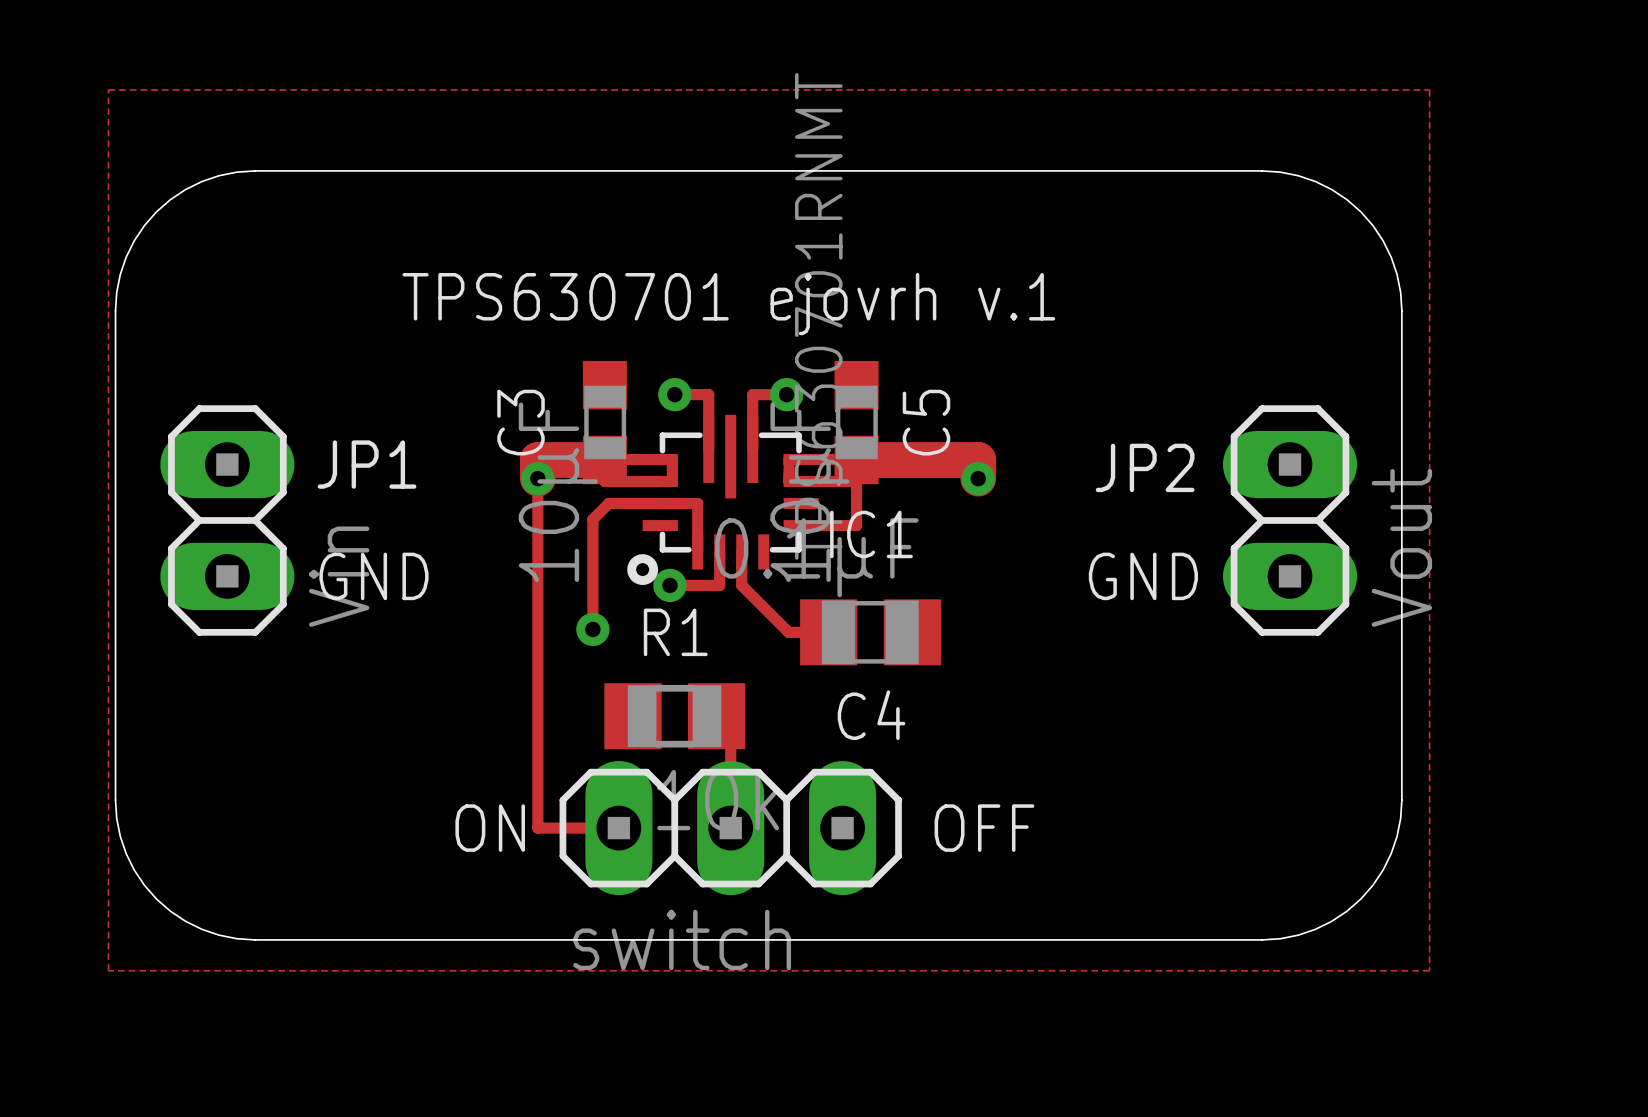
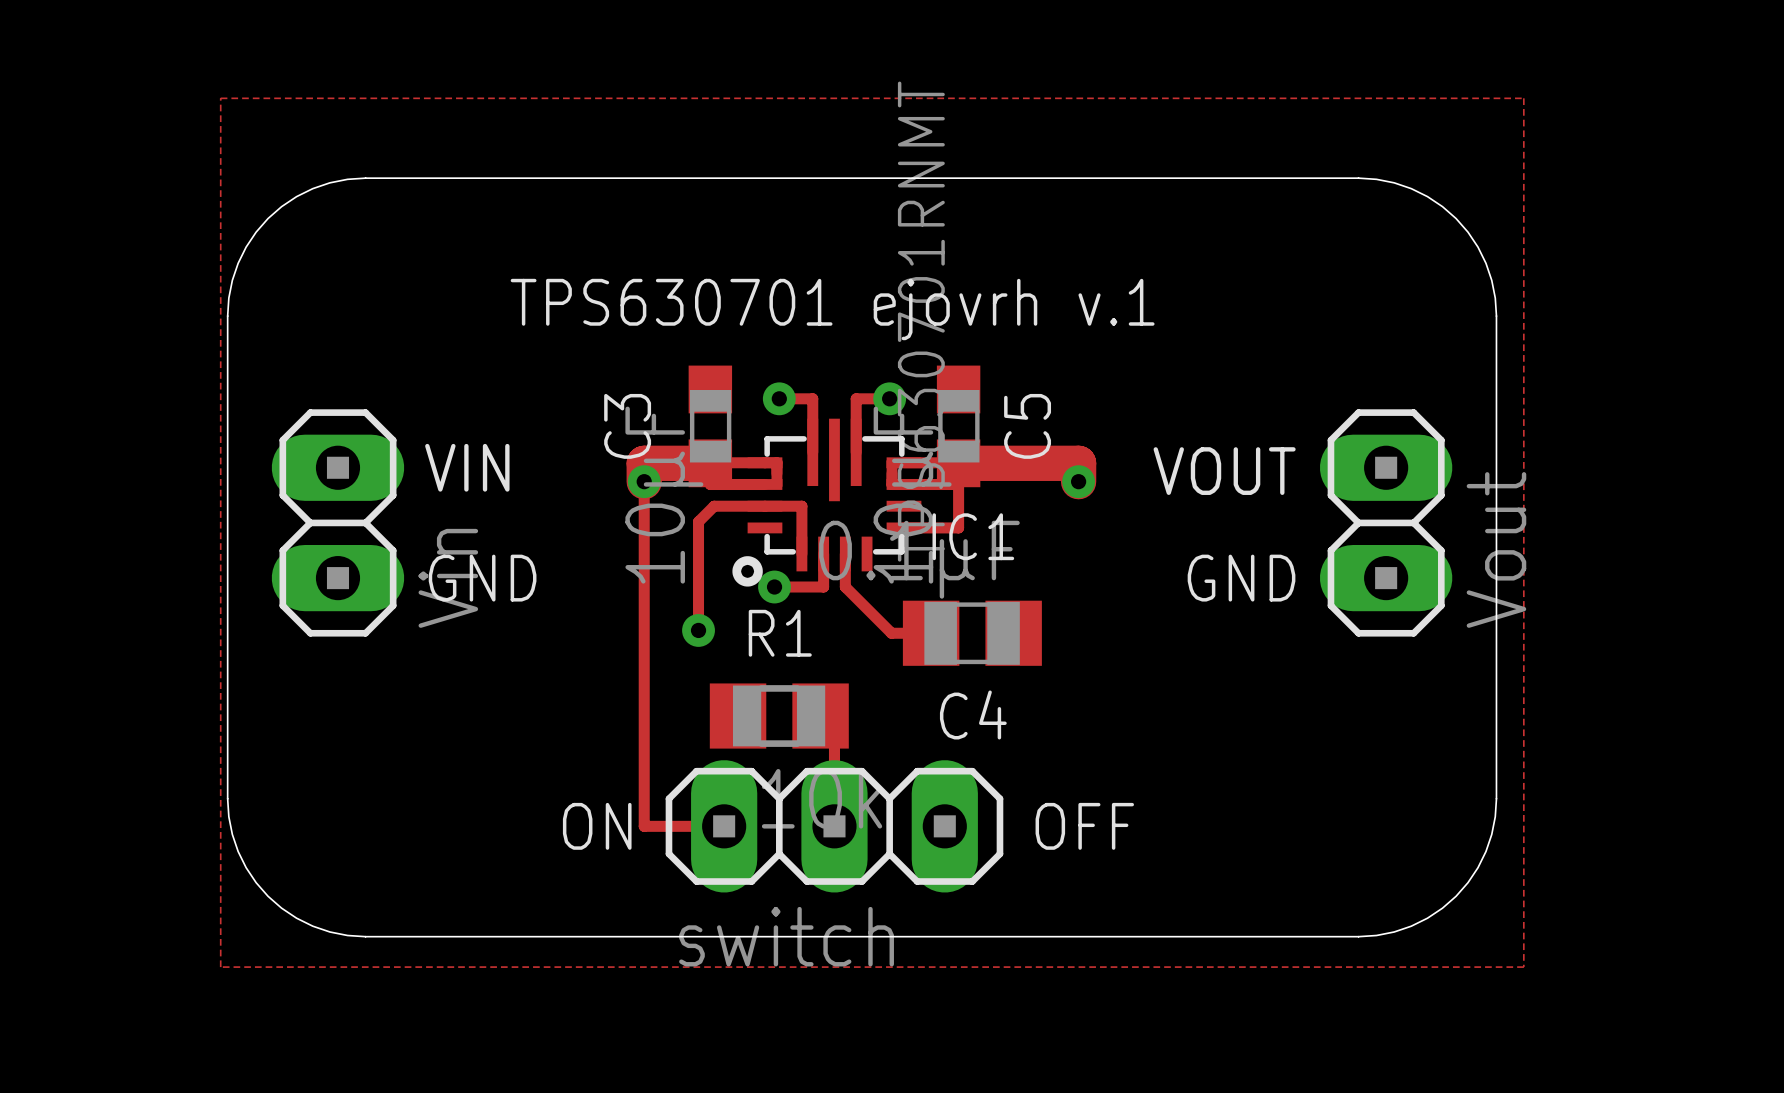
JP1 name: JP1 (367, 464) -> VIN (467, 467)
JP2 name: JP2 (1145, 467) -> VOUT (1224, 471)

